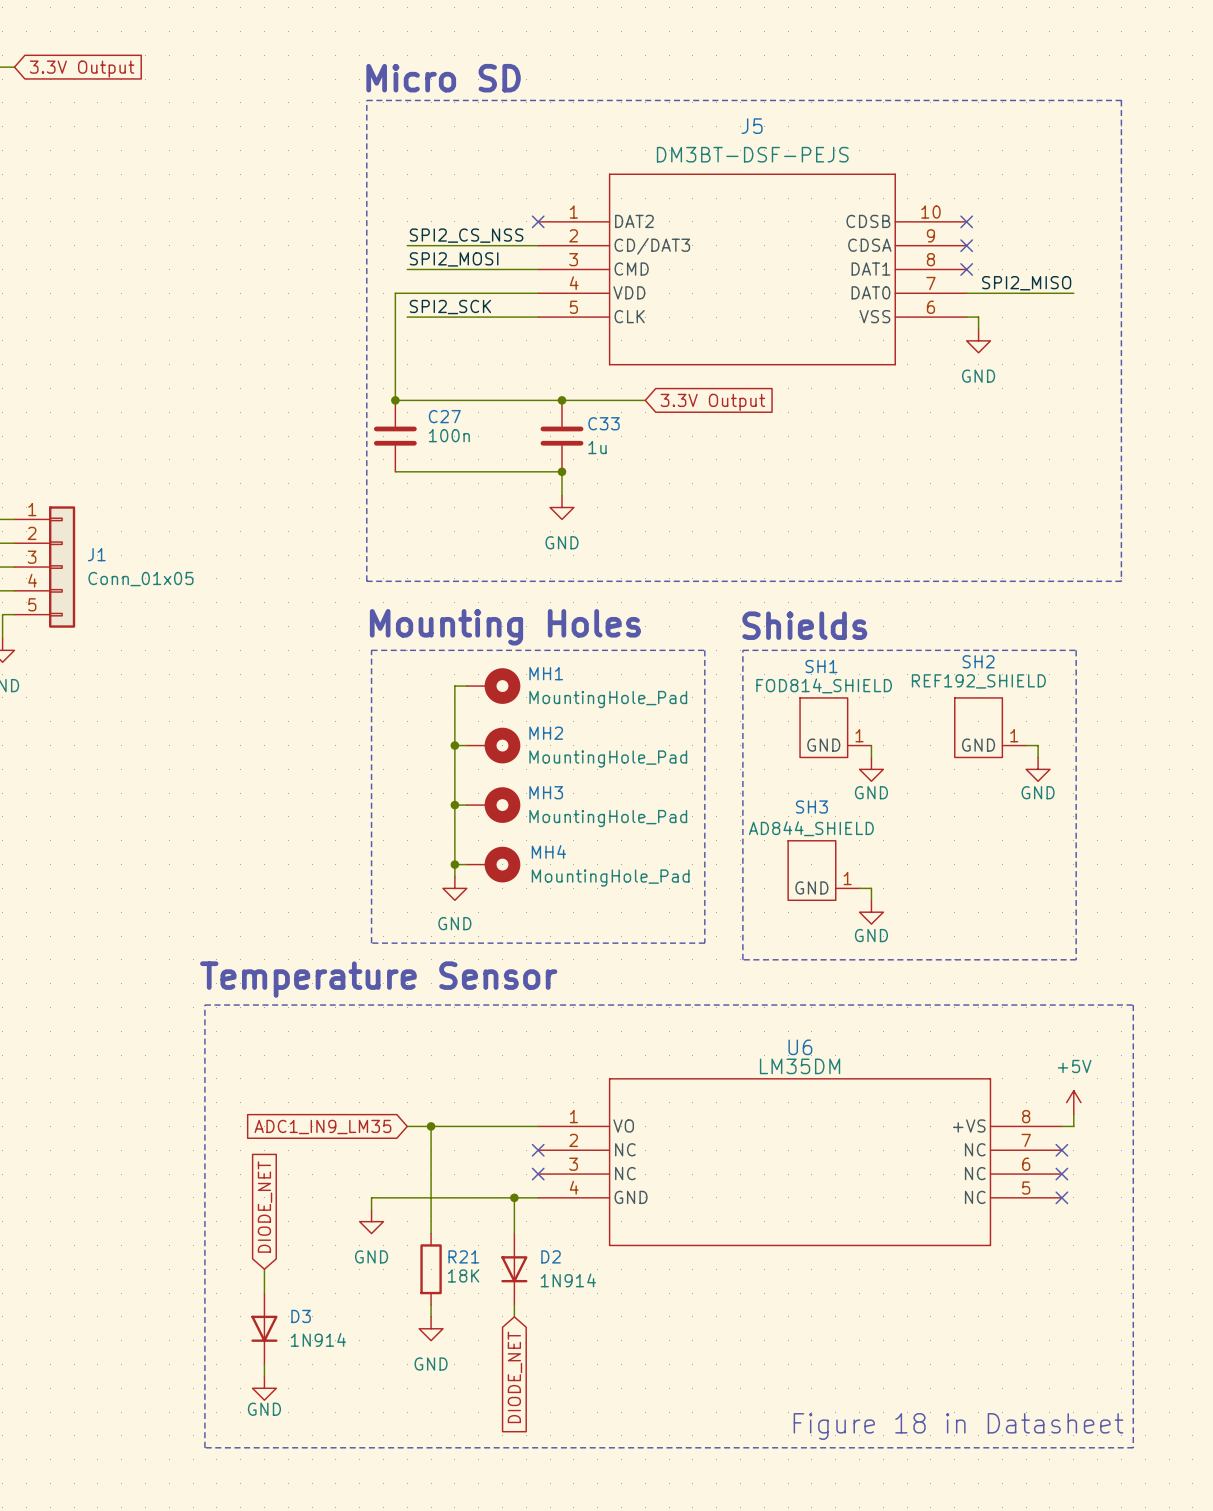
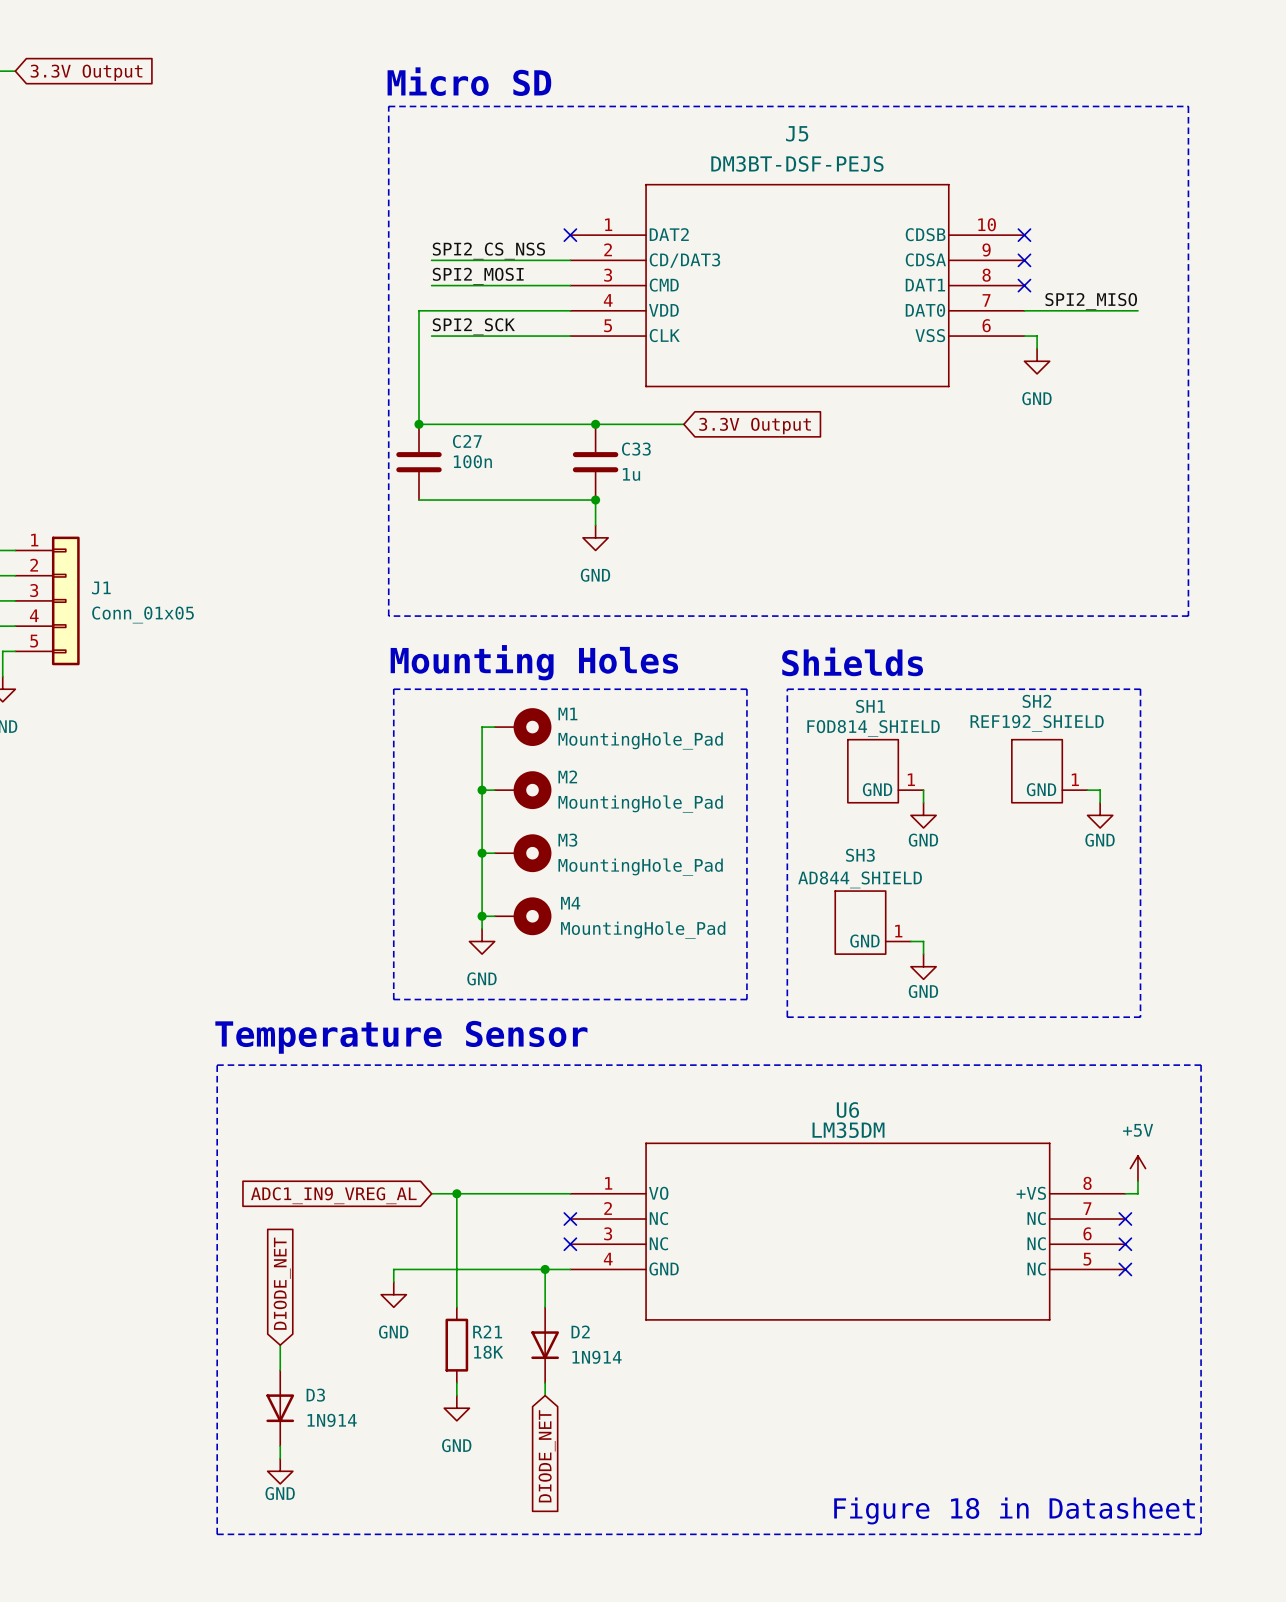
MH1 name: MH1 (546, 673) -> M1 (567, 713)
MH2 name: MH2 (546, 733) -> M2 (567, 776)
MH3 name: MH3 (546, 792) -> M3 (567, 840)
MH4 name: MH4 (548, 851) -> M4 (570, 903)
global label: ADC1_IN9_LM35 (322, 1127) -> ADC1_IN9_VREG_AL (333, 1195)

